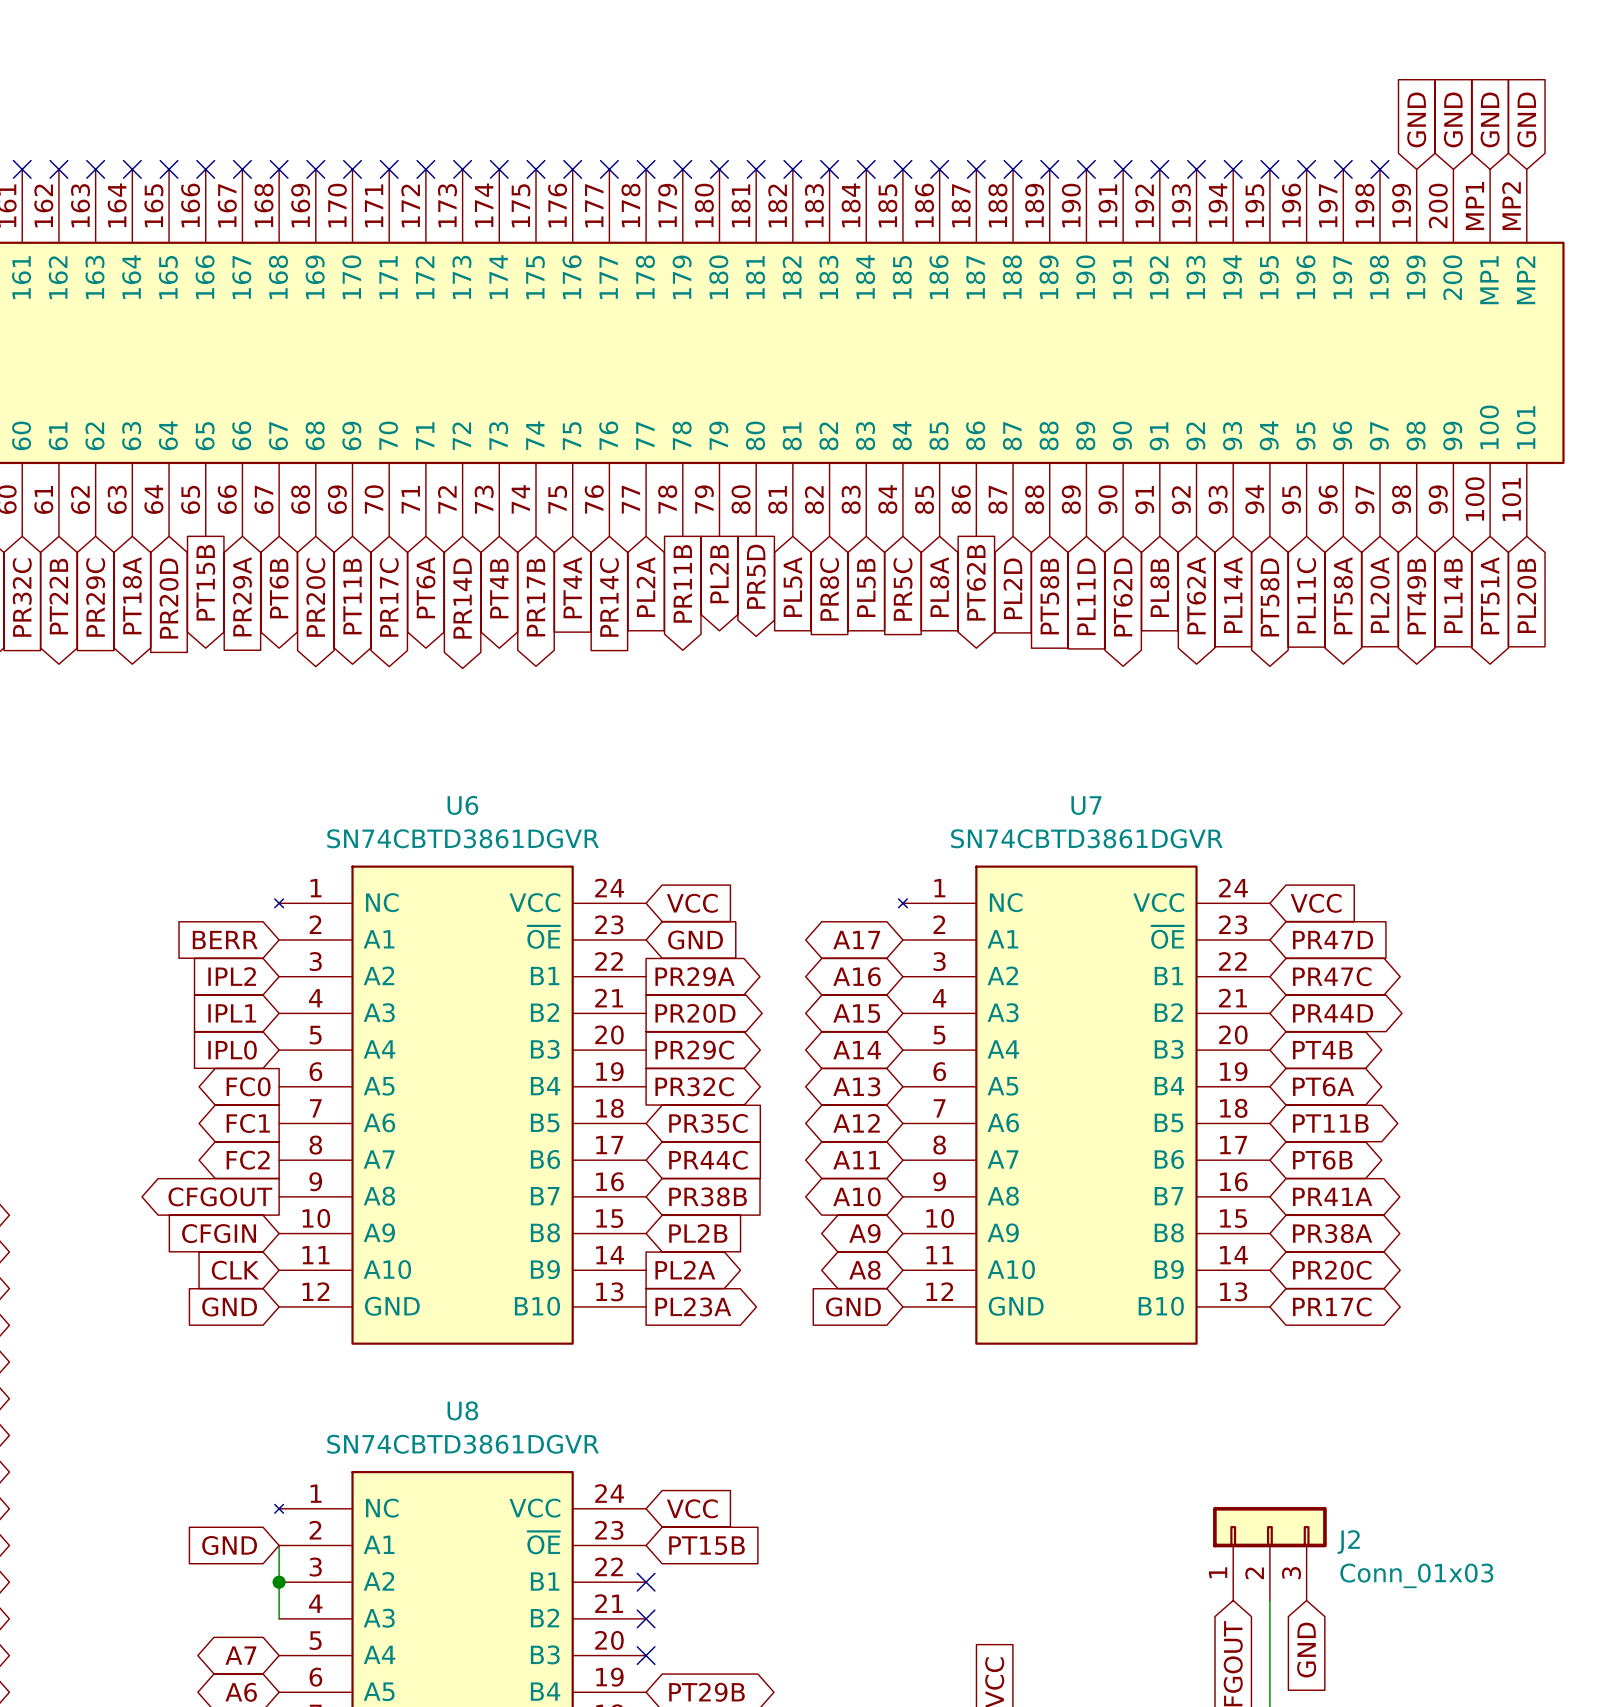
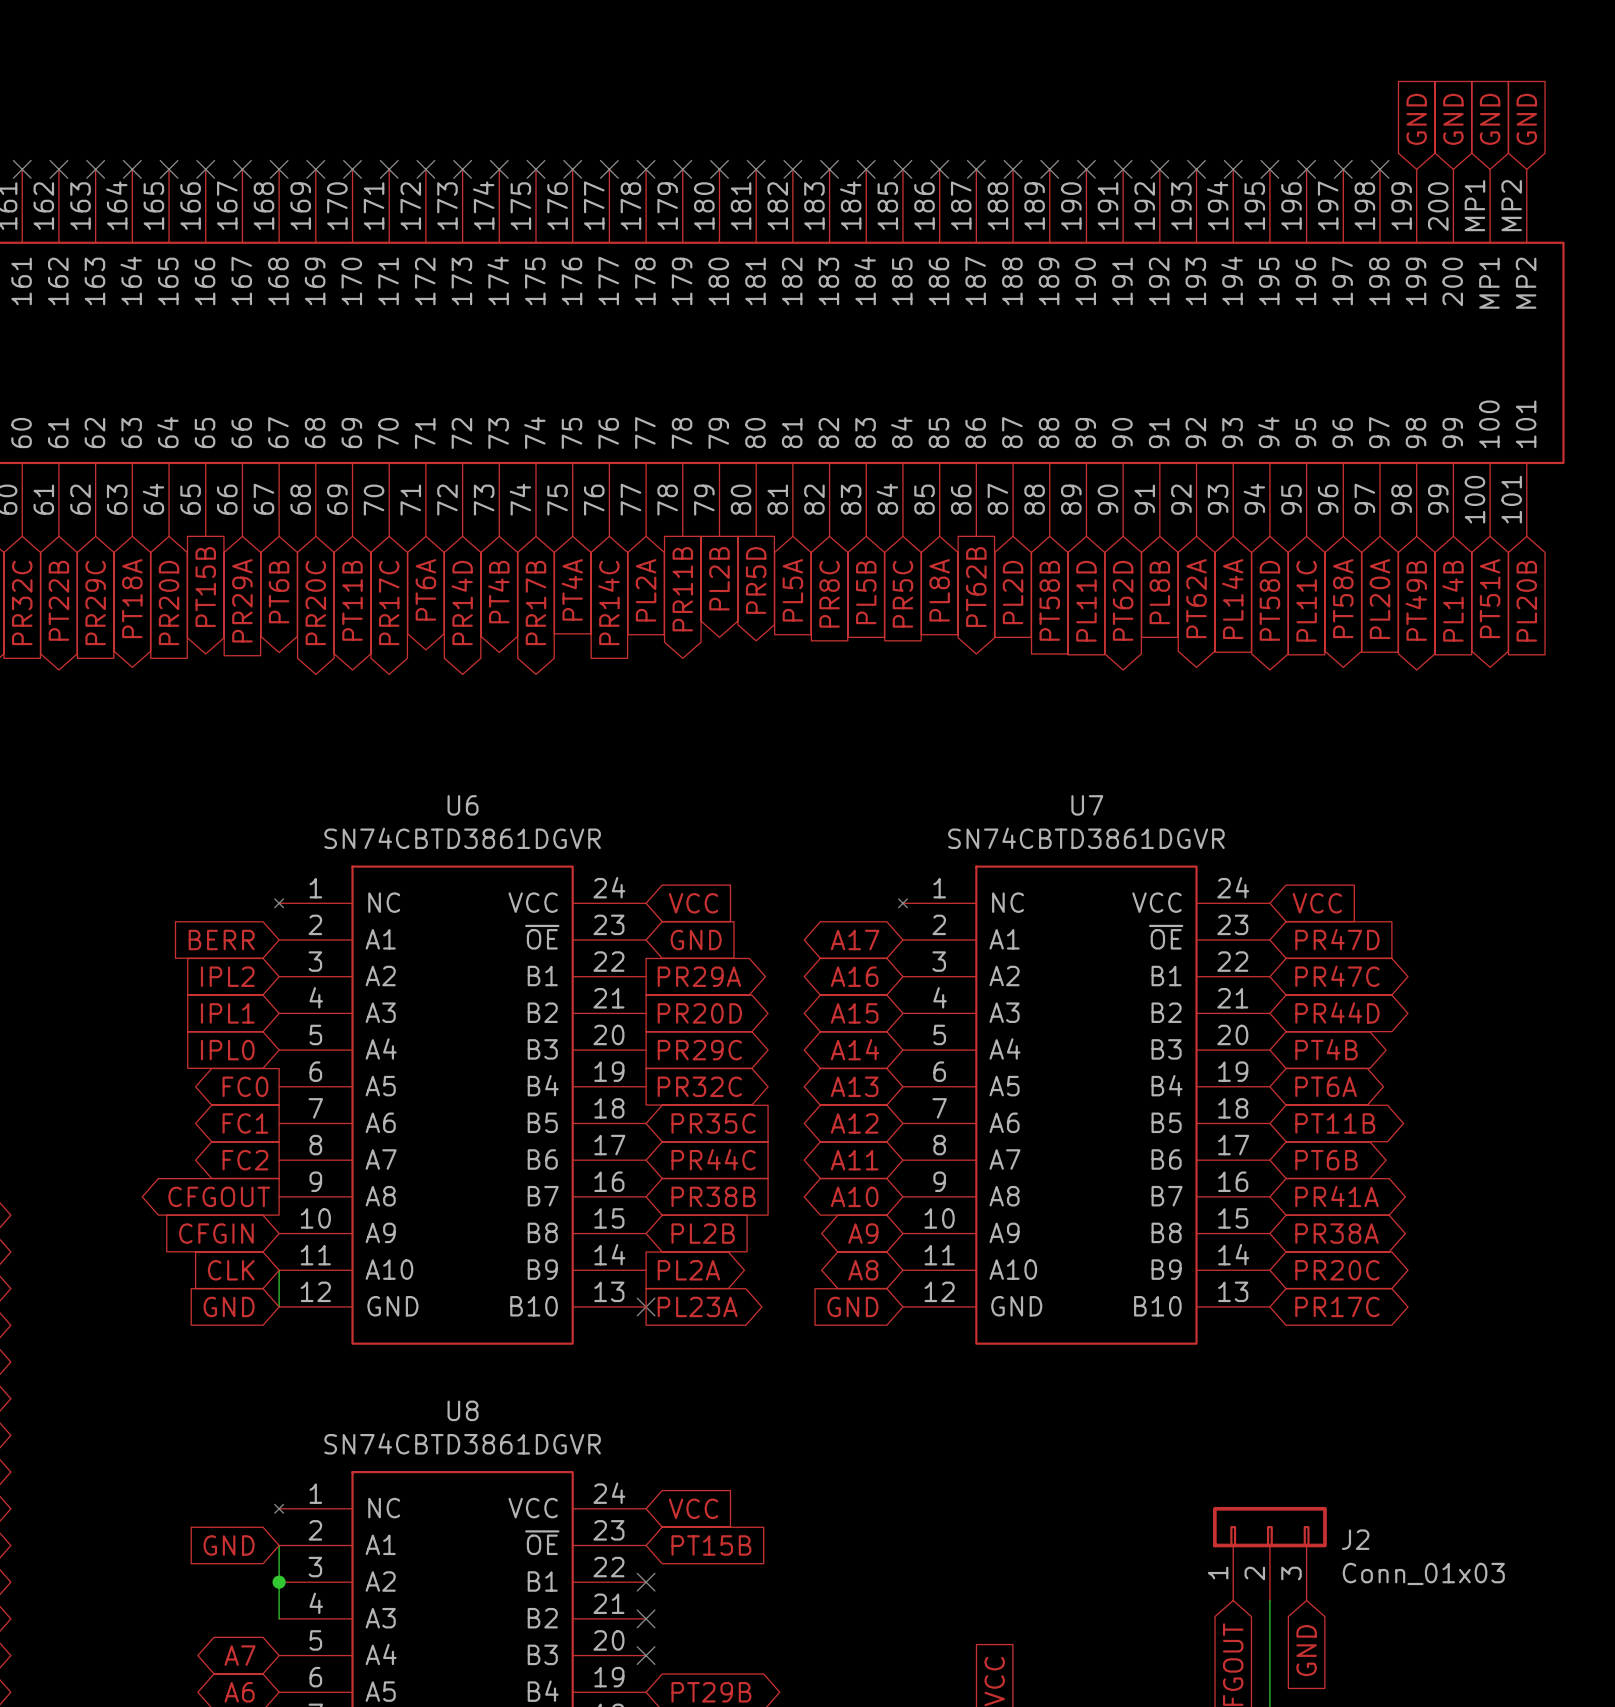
wire: none -> (279, 1270) (279, 1306)
no-connect mark: none -> (646, 1306)

